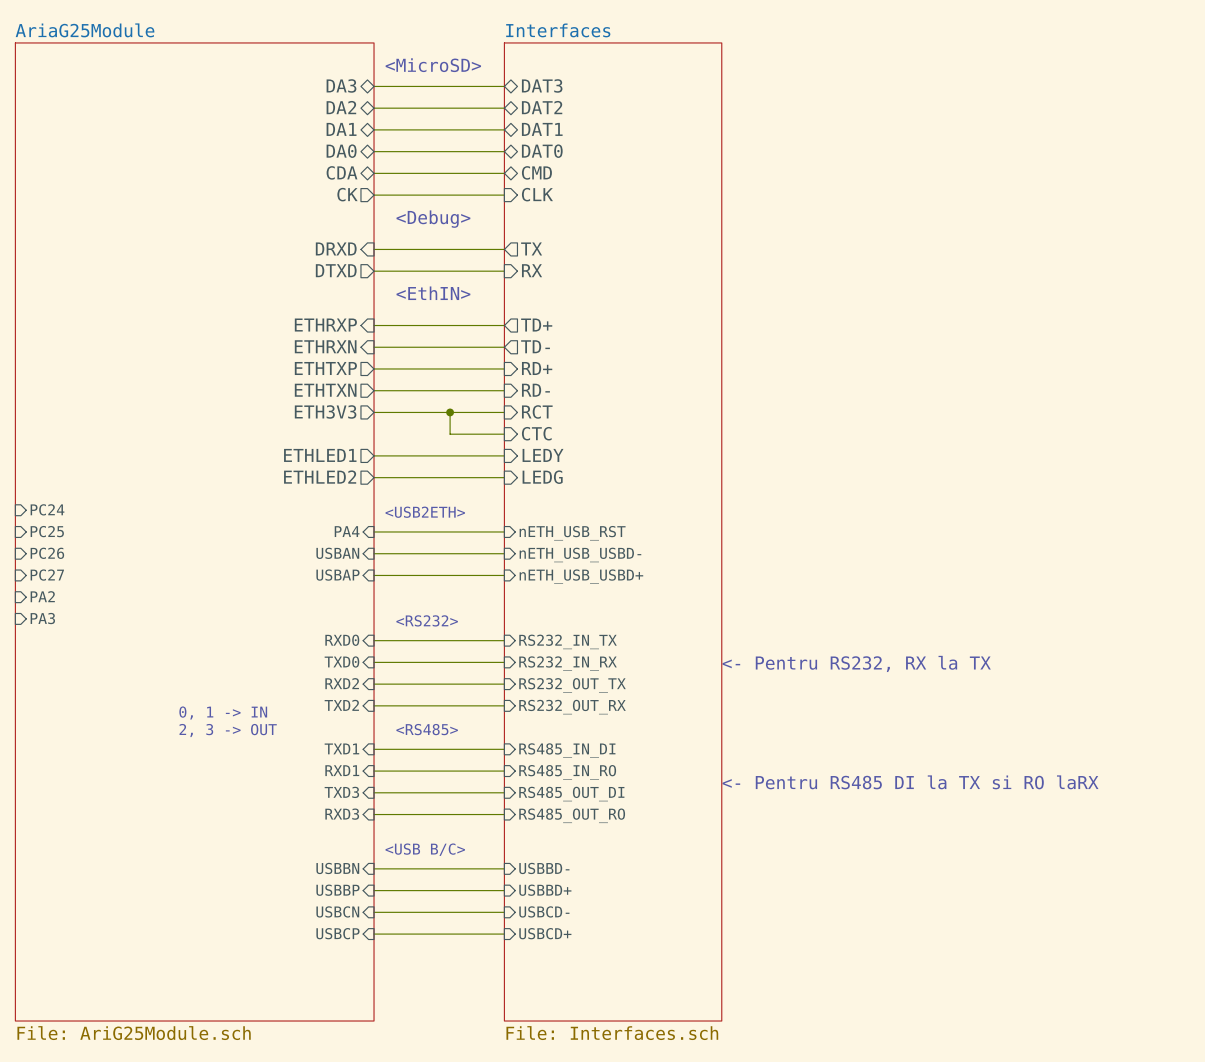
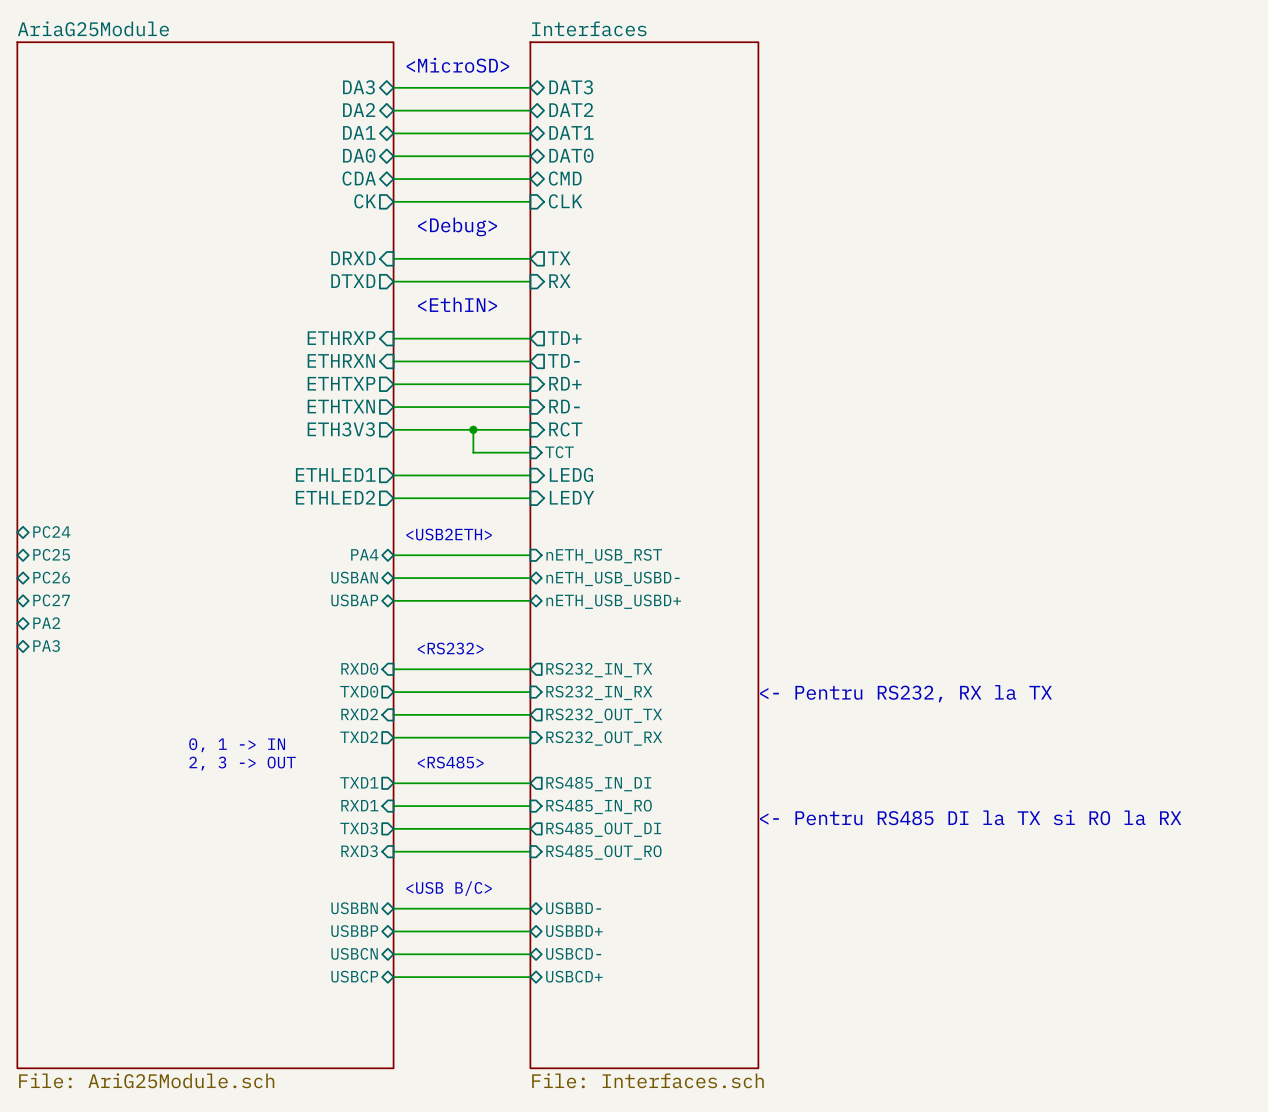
sheet pin: CTC (536, 433) -> TCT (559, 452)
sheet pin: LEDY (543, 455) -> LEDG (571, 474)
sheet pin: LEDG (542, 477) -> LEDY (572, 497)
sheet pin shape: input (47, 509) -> bidirectional (51, 532)
sheet pin shape: input (47, 531) -> bidirectional (51, 554)
sheet pin shape: input (347, 531) -> bidirectional (364, 554)
sheet pin shape: input (47, 553) -> bidirectional (51, 577)
sheet pin shape: input (337, 553) -> bidirectional (354, 577)
sheet pin shape: input (580, 554) -> bidirectional (612, 578)
sheet pin shape: input (47, 575) -> bidirectional (51, 600)
sheet pin shape: input (337, 575) -> bidirectional (354, 600)
sheet pin shape: input (581, 576) -> bidirectional (613, 601)
sheet pin shape: input (42, 596) -> bidirectional (46, 623)
sheet pin shape: input (42, 618) -> bidirectional (46, 646)
sheet pin shape: input (568, 641) -> output (599, 670)
sheet pin shape: input (341, 661) -> output (359, 691)
sheet pin shape: input (572, 685) -> output (604, 715)
sheet pin shape: input (341, 705) -> output (359, 737)
sheet pin shape: input (341, 748) -> output (359, 782)
sheet pin shape: input (567, 750) -> output (598, 784)
text: <- Pentru RS485 DI la TX si RO laRX (910, 782) -> <- Pentru RS485 DI la TX si RO la RX (970, 817)
sheet pin shape: input (341, 792) -> output (359, 828)
sheet pin shape: input (571, 794) -> output (603, 829)
sheet pin shape: input (337, 868) -> bidirectional (354, 908)
sheet pin shape: input (544, 868) -> bidirectional (573, 908)
sheet pin shape: input (337, 890) -> bidirectional (354, 931)
sheet pin shape: input (545, 890) -> bidirectional (574, 931)
sheet pin shape: input (337, 911) -> bidirectional (354, 953)
sheet pin shape: input (544, 911) -> bidirectional (573, 953)
sheet pin shape: input (337, 933) -> bidirectional (354, 976)
sheet pin shape: input (545, 933) -> bidirectional (574, 976)

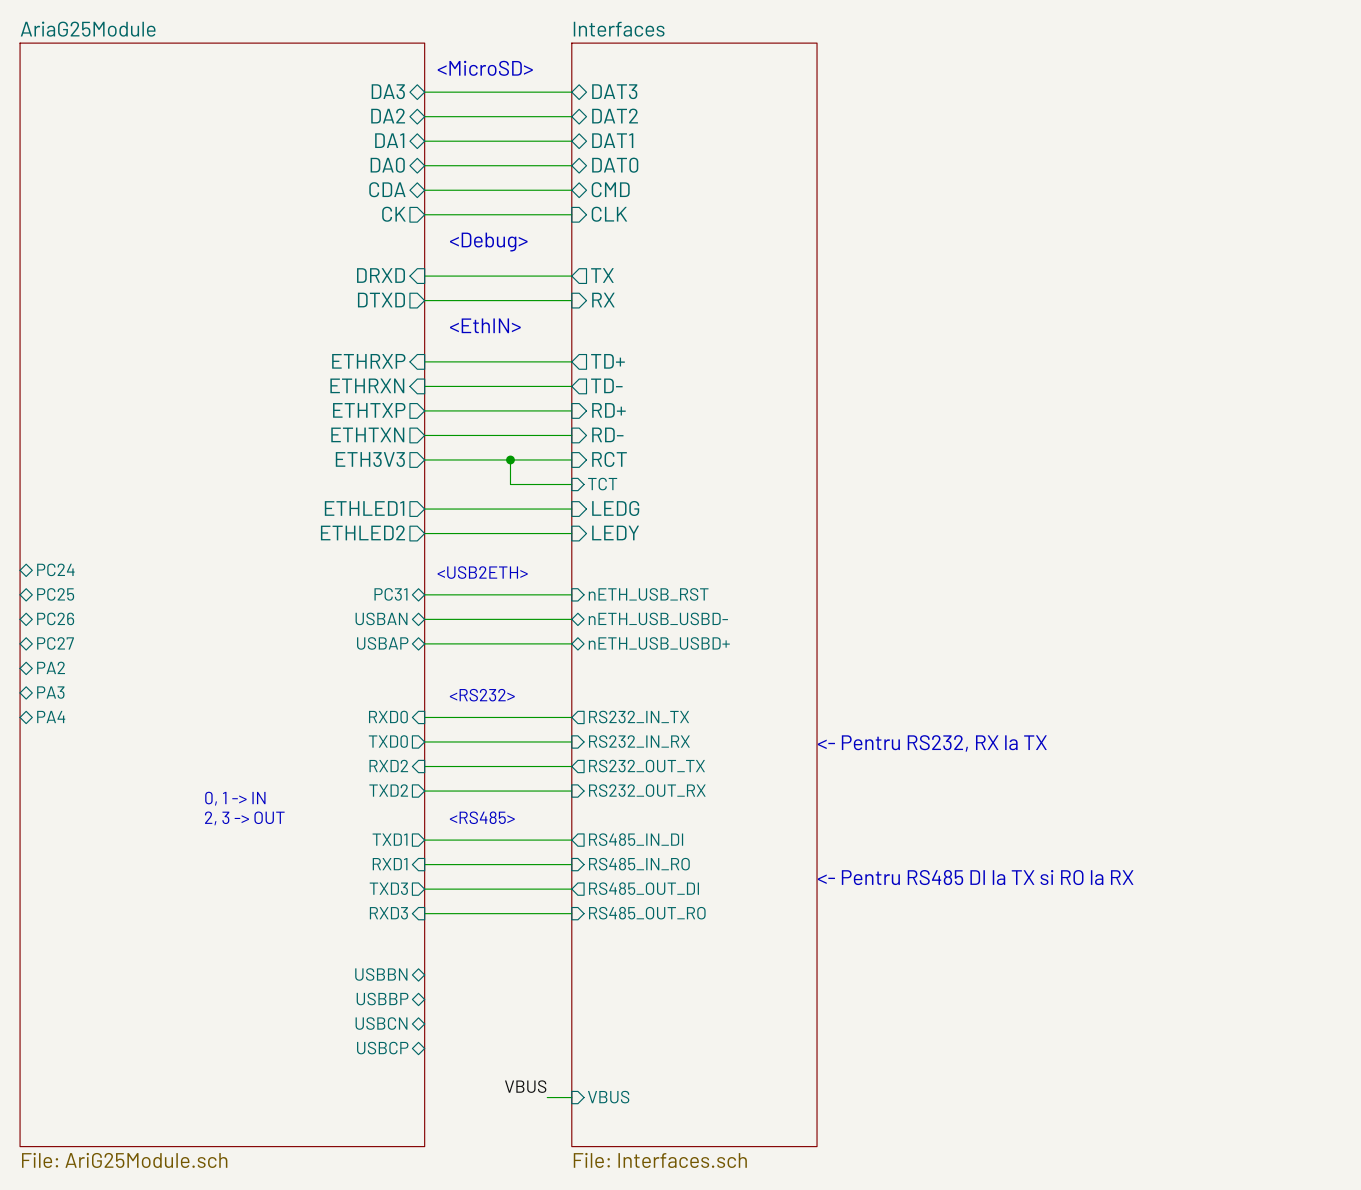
sheet pin: PA4 (364, 554) -> PC31 (390, 594)
sheet pin: none -> PA4 (51, 717)
text: <USB B/C> (449, 888) -> none
wire: (393, 908) (530, 908) -> none
sheet pin: USBBD- (573, 908) -> none
wire: (393, 931) (530, 931) -> none
sheet pin: USBBD+ (574, 931) -> none
sheet pin: USBCD- (573, 953) -> none
wire: (393, 954) (530, 954) -> none
sheet pin: USBCD+ (574, 976) -> none
wire: (393, 977) (530, 977) -> none
label: none -> VBUS (525, 1086)
wire: none -> (547, 1097) (571, 1097)
sheet pin: none -> VBUS (608, 1097)

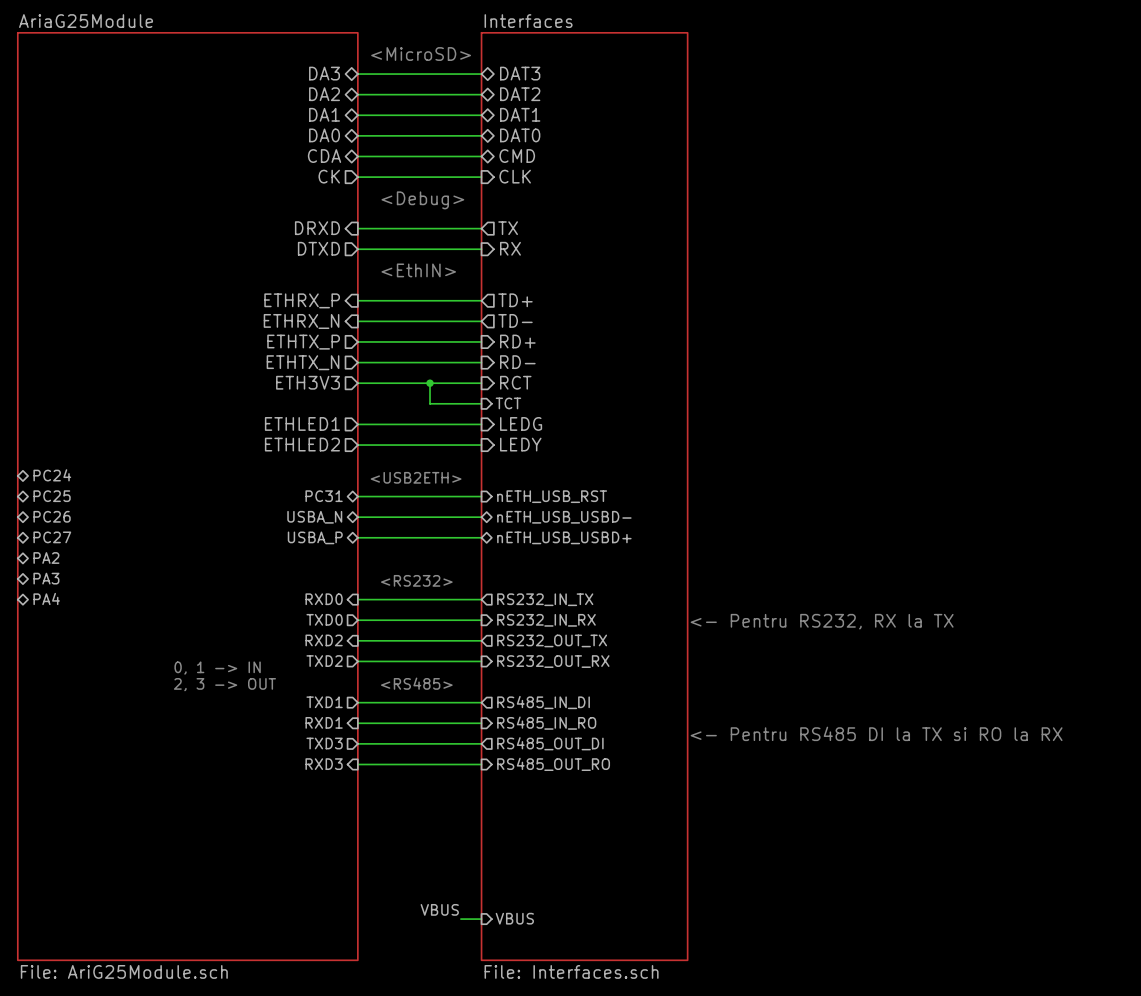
sheet pin: ETHRXP (368, 361) -> ETHRX_P (302, 300)
sheet pin: ETHRXN (367, 385) -> ETHRX_N (301, 321)
sheet pin: ETHTXP (369, 410) -> ETHTX_P (303, 342)
sheet pin: ETHTXN (367, 434) -> ETHTX_N (303, 362)
sheet pin: USBAN (381, 618) -> USBA_N (314, 517)
sheet pin: USBAP (382, 643) -> USBA_P (315, 537)
sheet pin: USBBN (381, 974) -> none
sheet pin: USBBP (382, 999) -> none
sheet pin: USBCN (381, 1023) -> none
sheet pin: USBCP (382, 1048) -> none

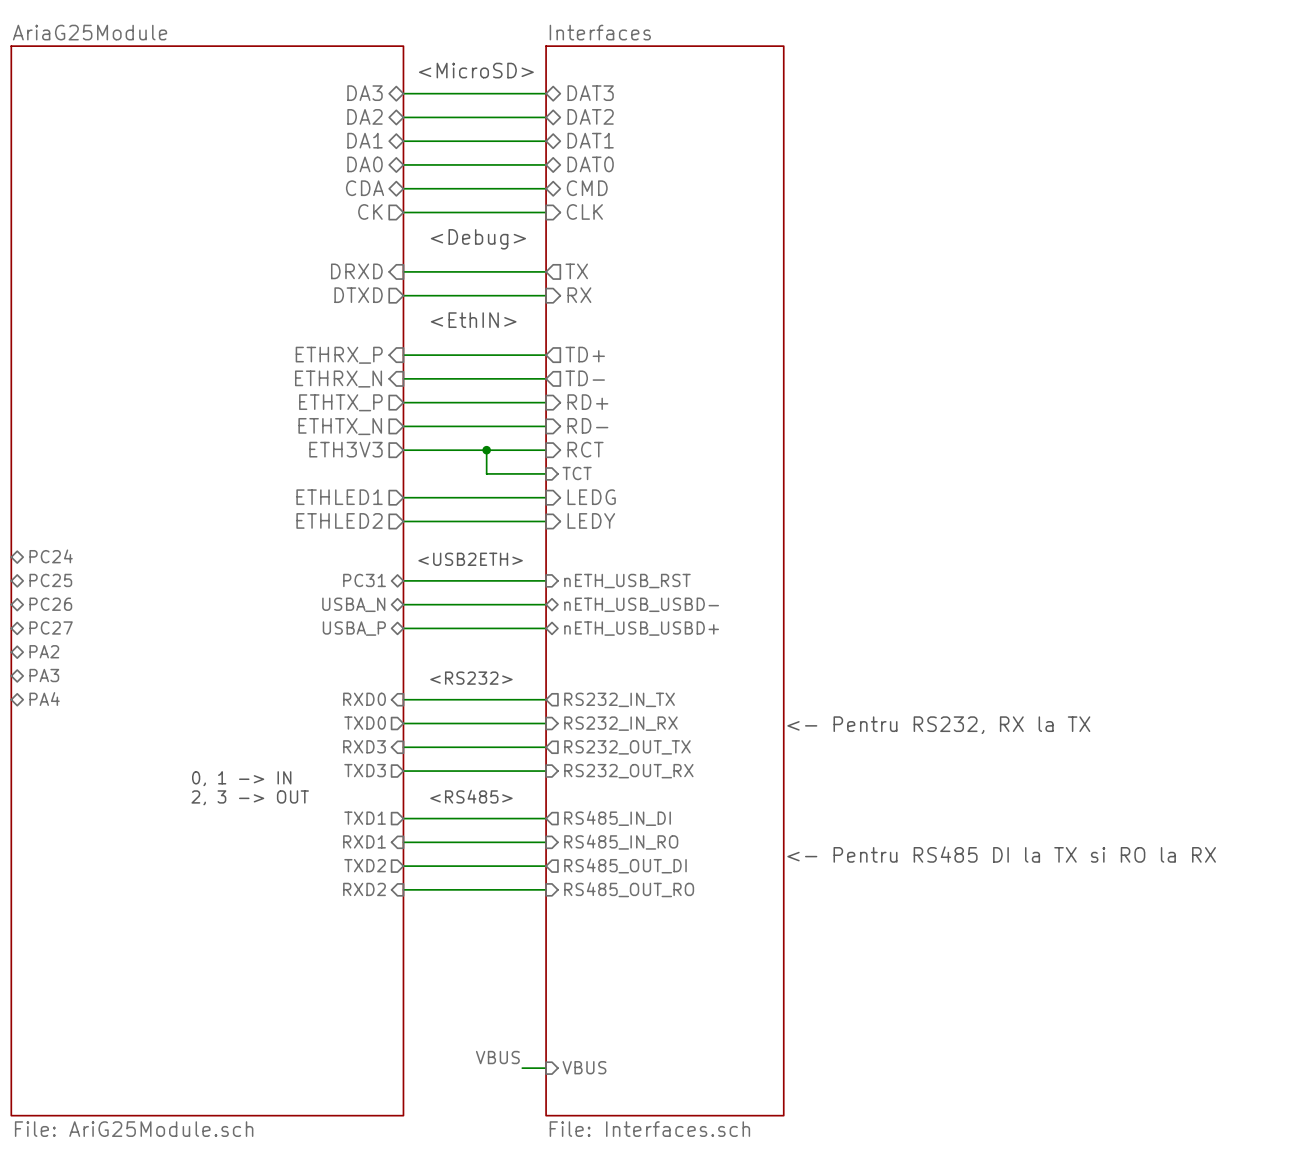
sheet pin: RXD2 (324, 640) -> RXD3 (364, 746)
sheet pin: TXD2 (324, 661) -> TXD3 (365, 770)
sheet pin: TXD3 (324, 743) -> TXD2 (365, 865)
sheet pin: RXD3 (324, 764) -> RXD2 (364, 889)

